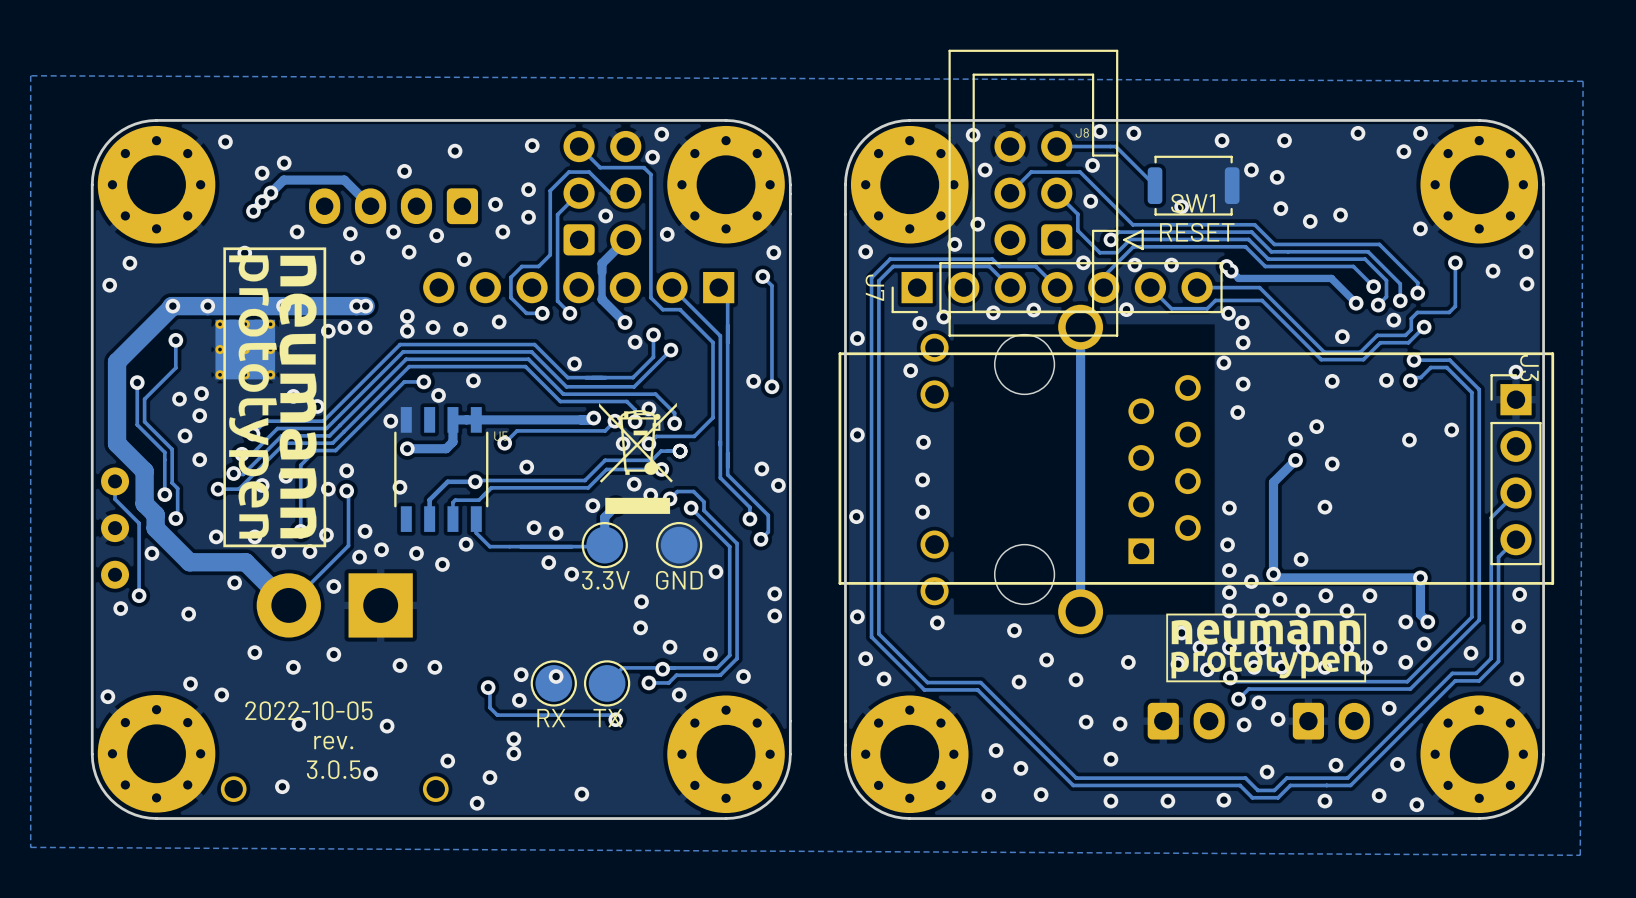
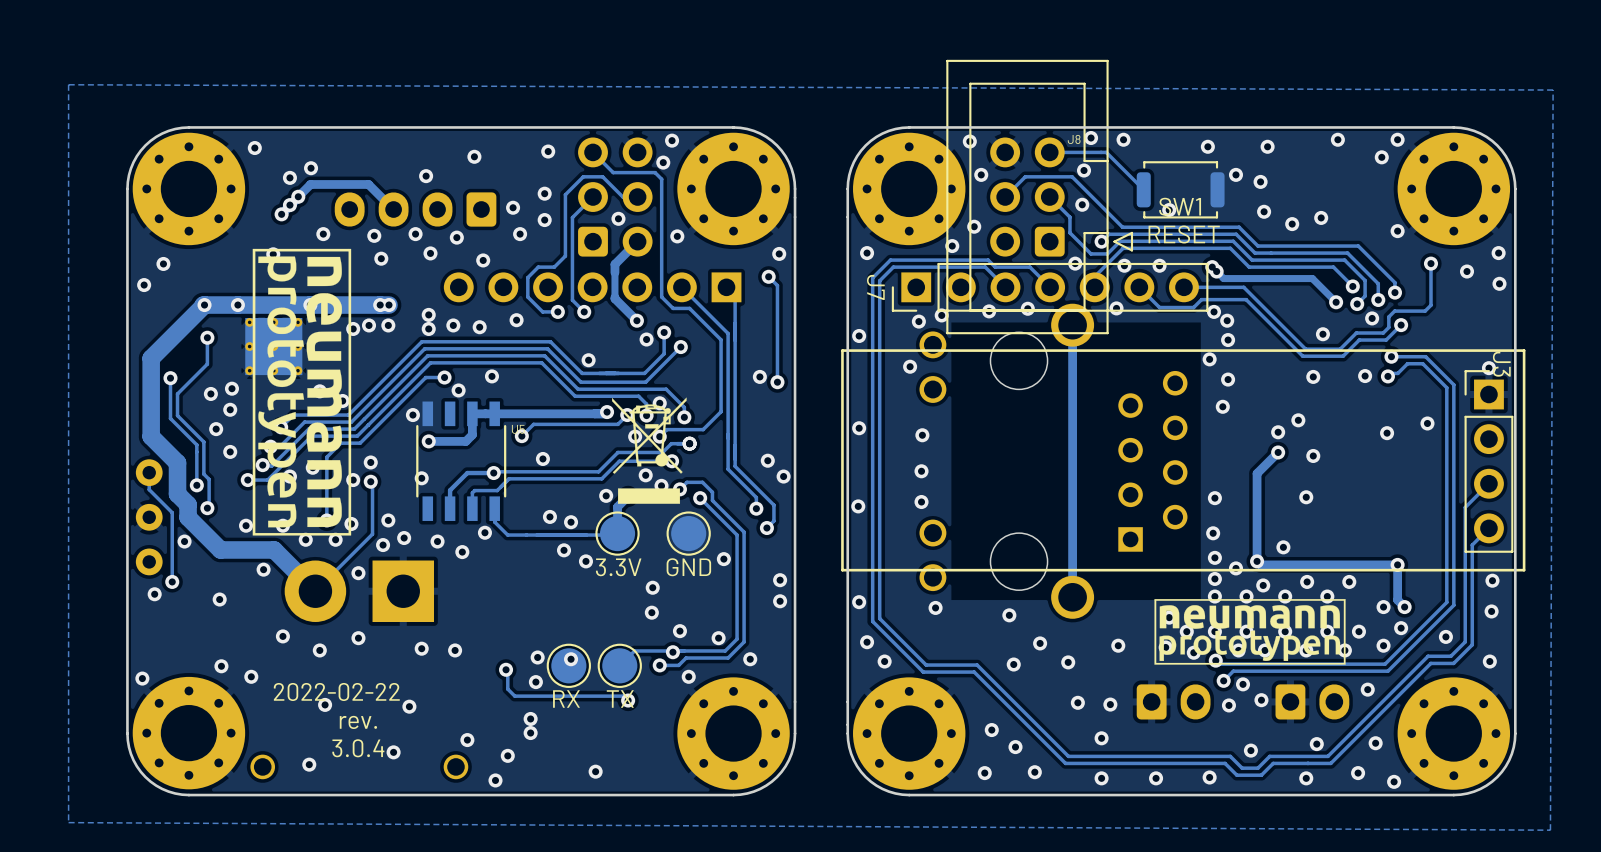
text: 2022-10-05 (308, 710) -> 2022-02-22 (336, 691)
text: 3.0.5 (333, 769) -> 3.0.4 (358, 748)

